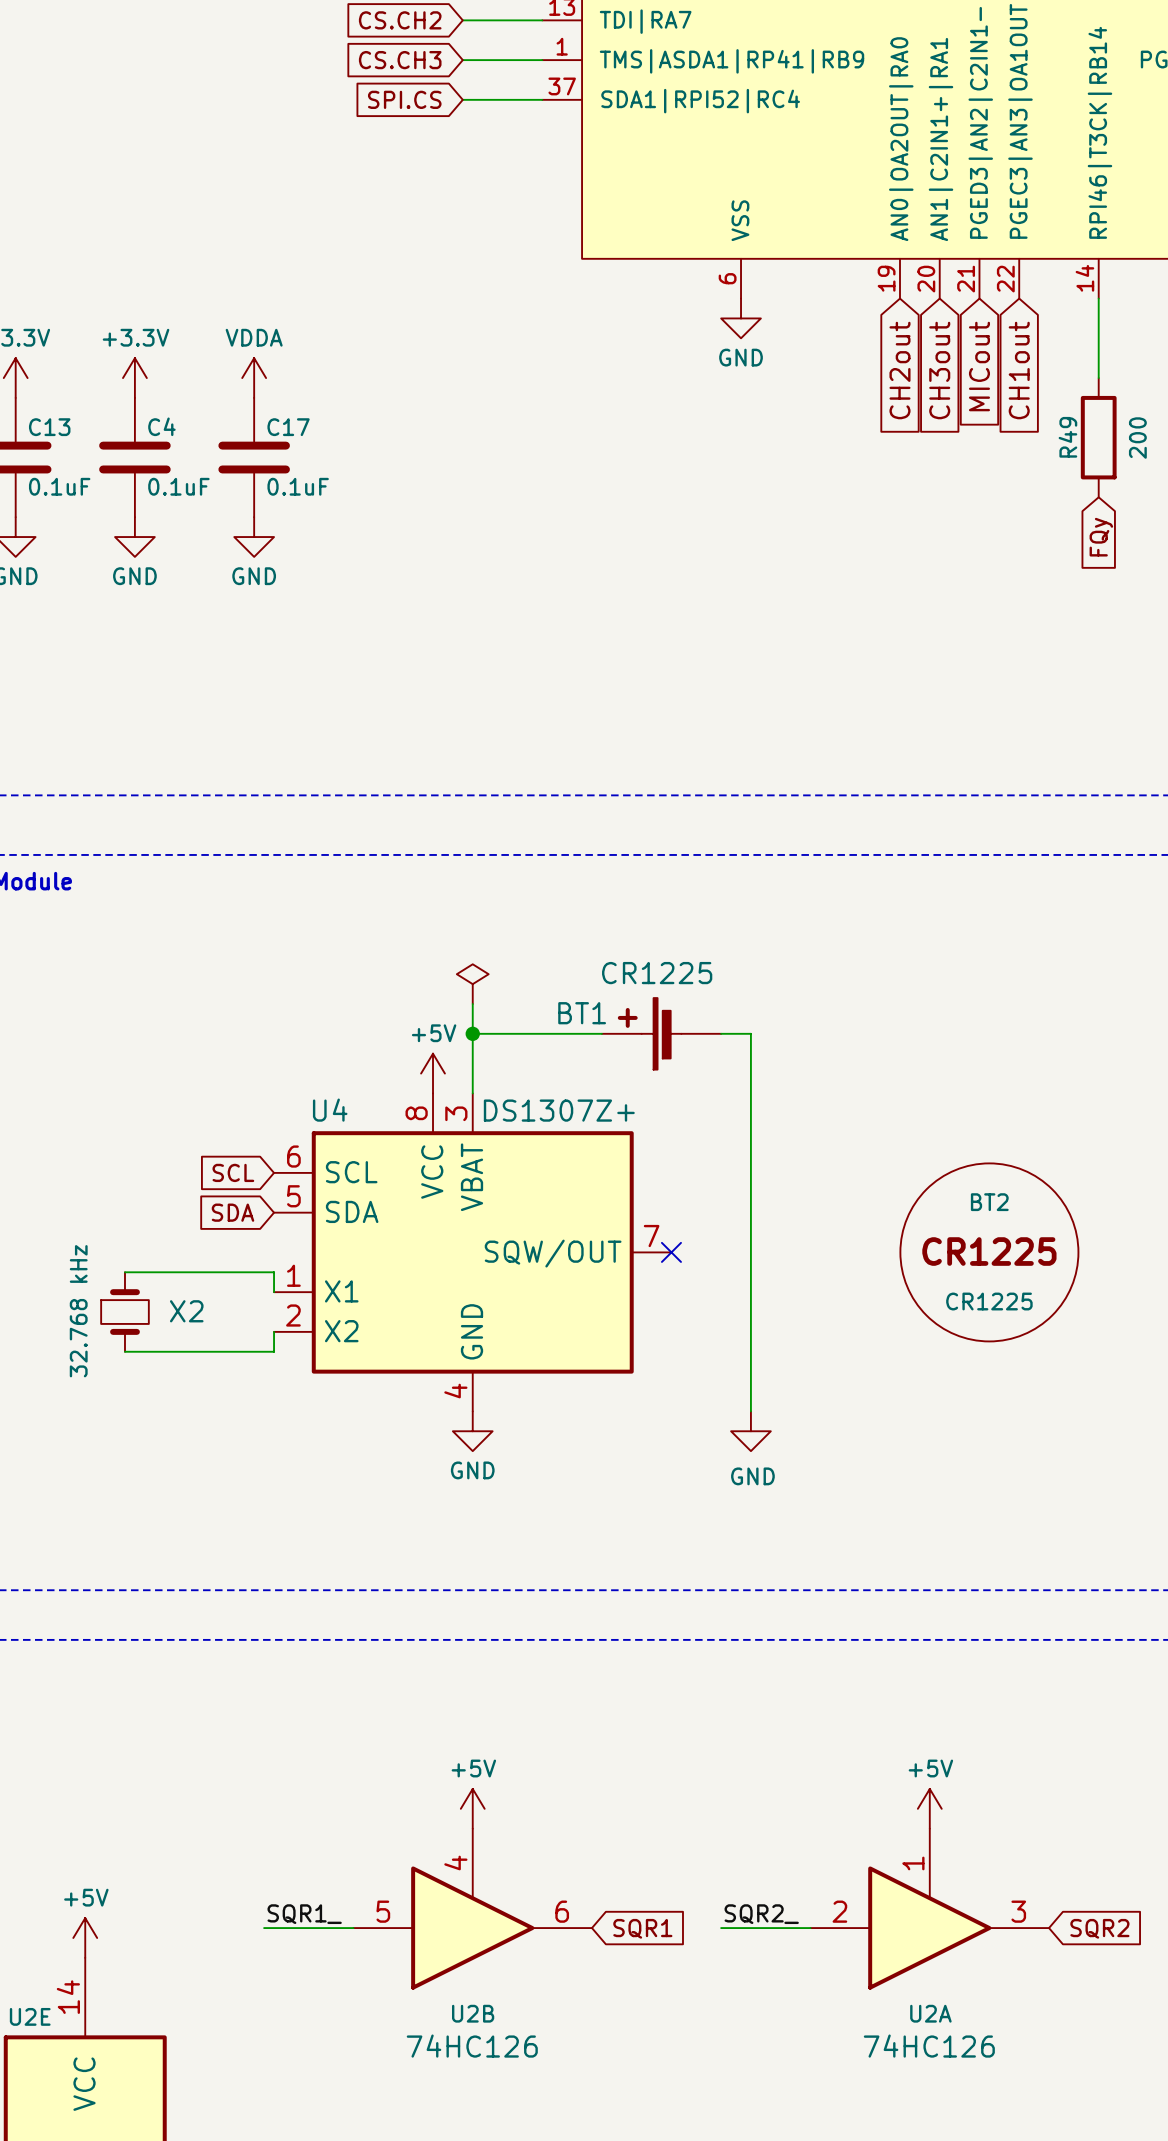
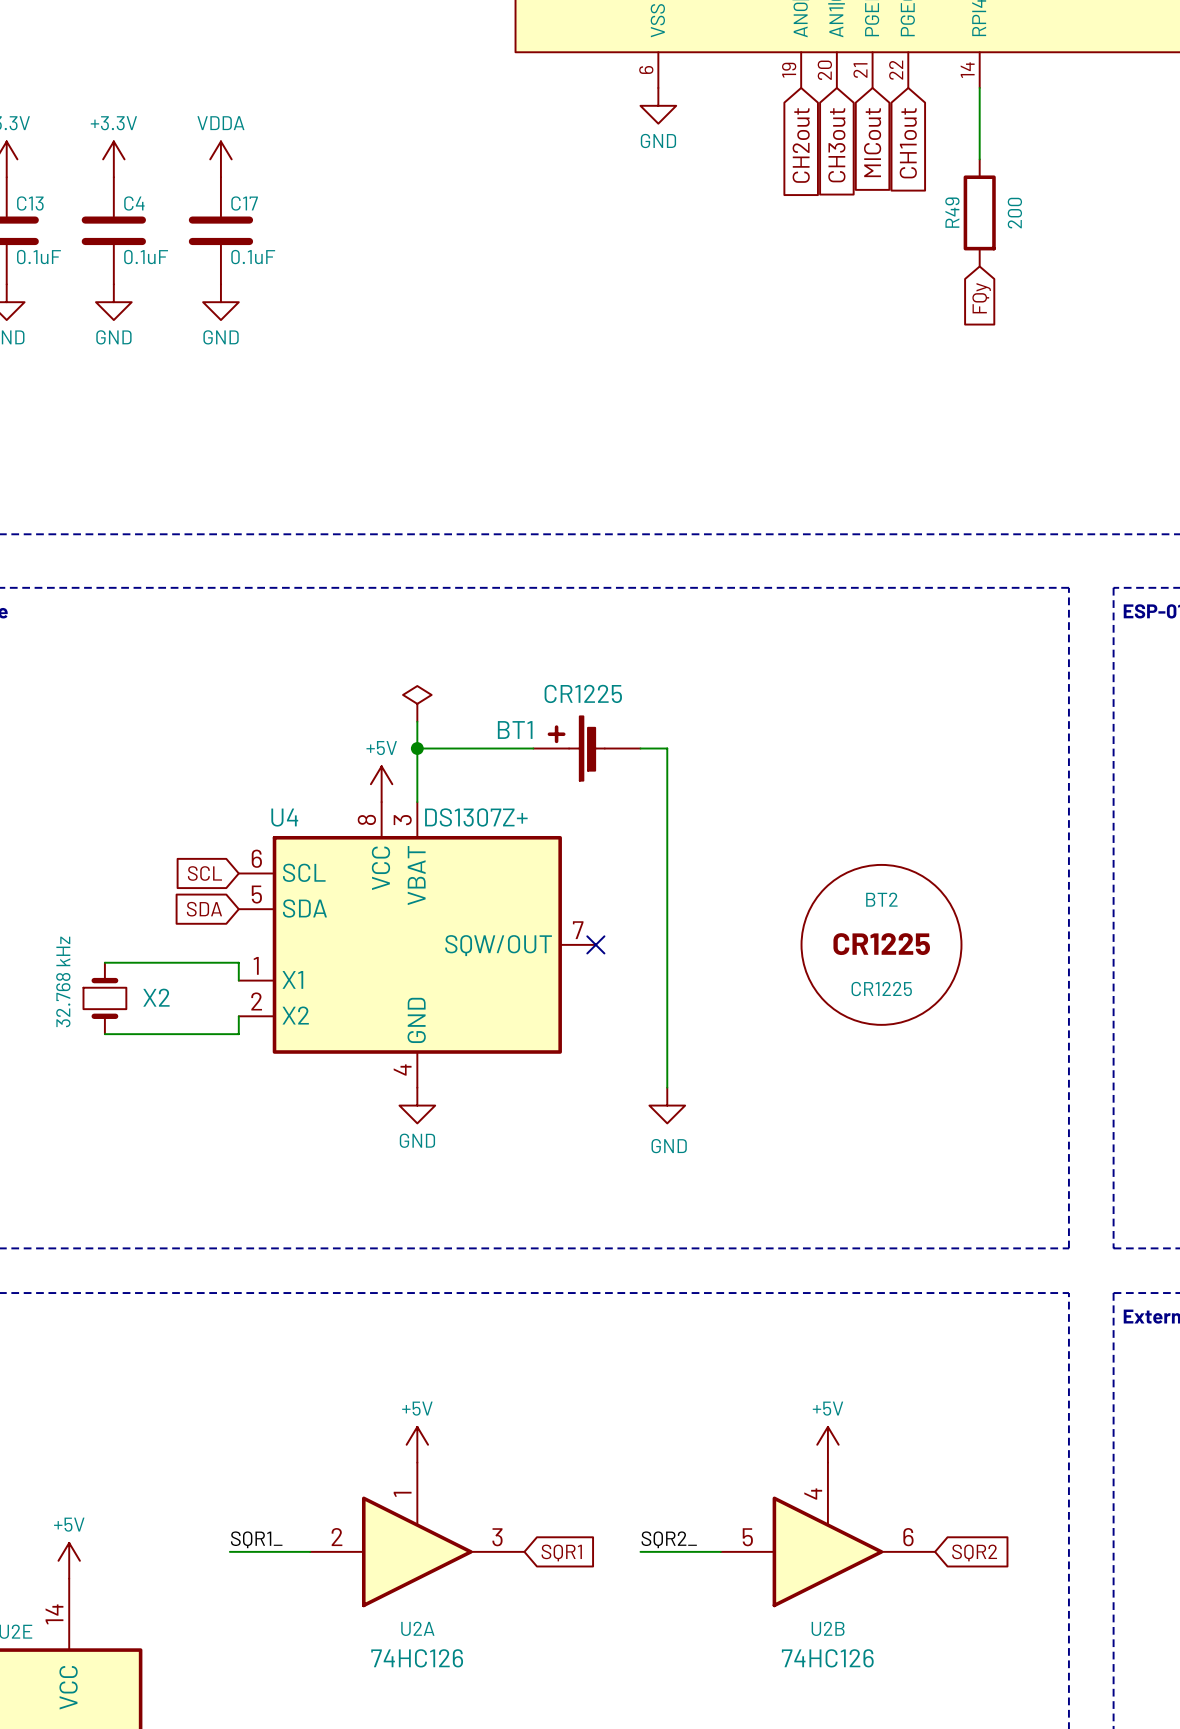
U2B position: (472, 1909) -> (827, 1534)
U2A position: (929, 1909) -> (417, 1534)

